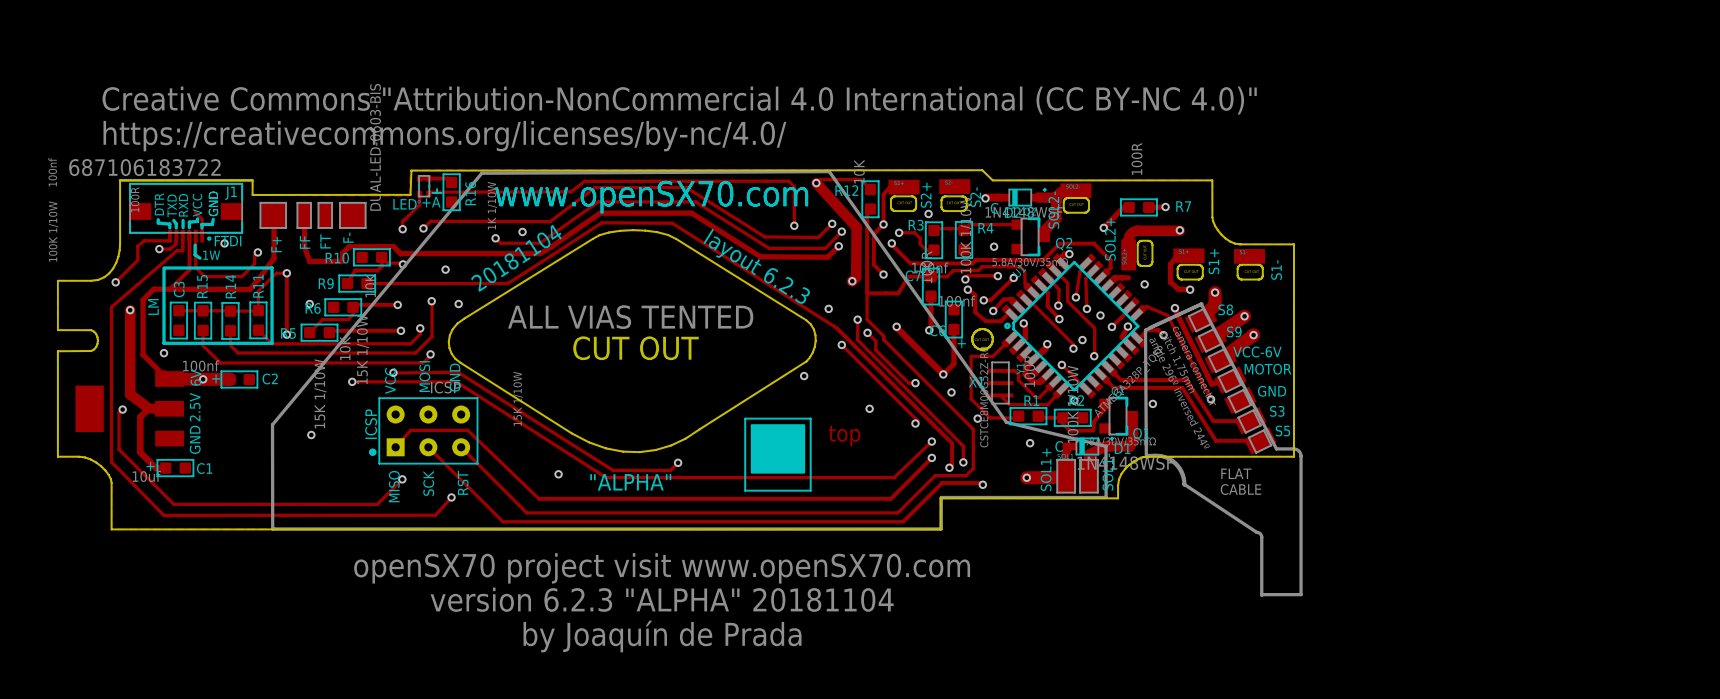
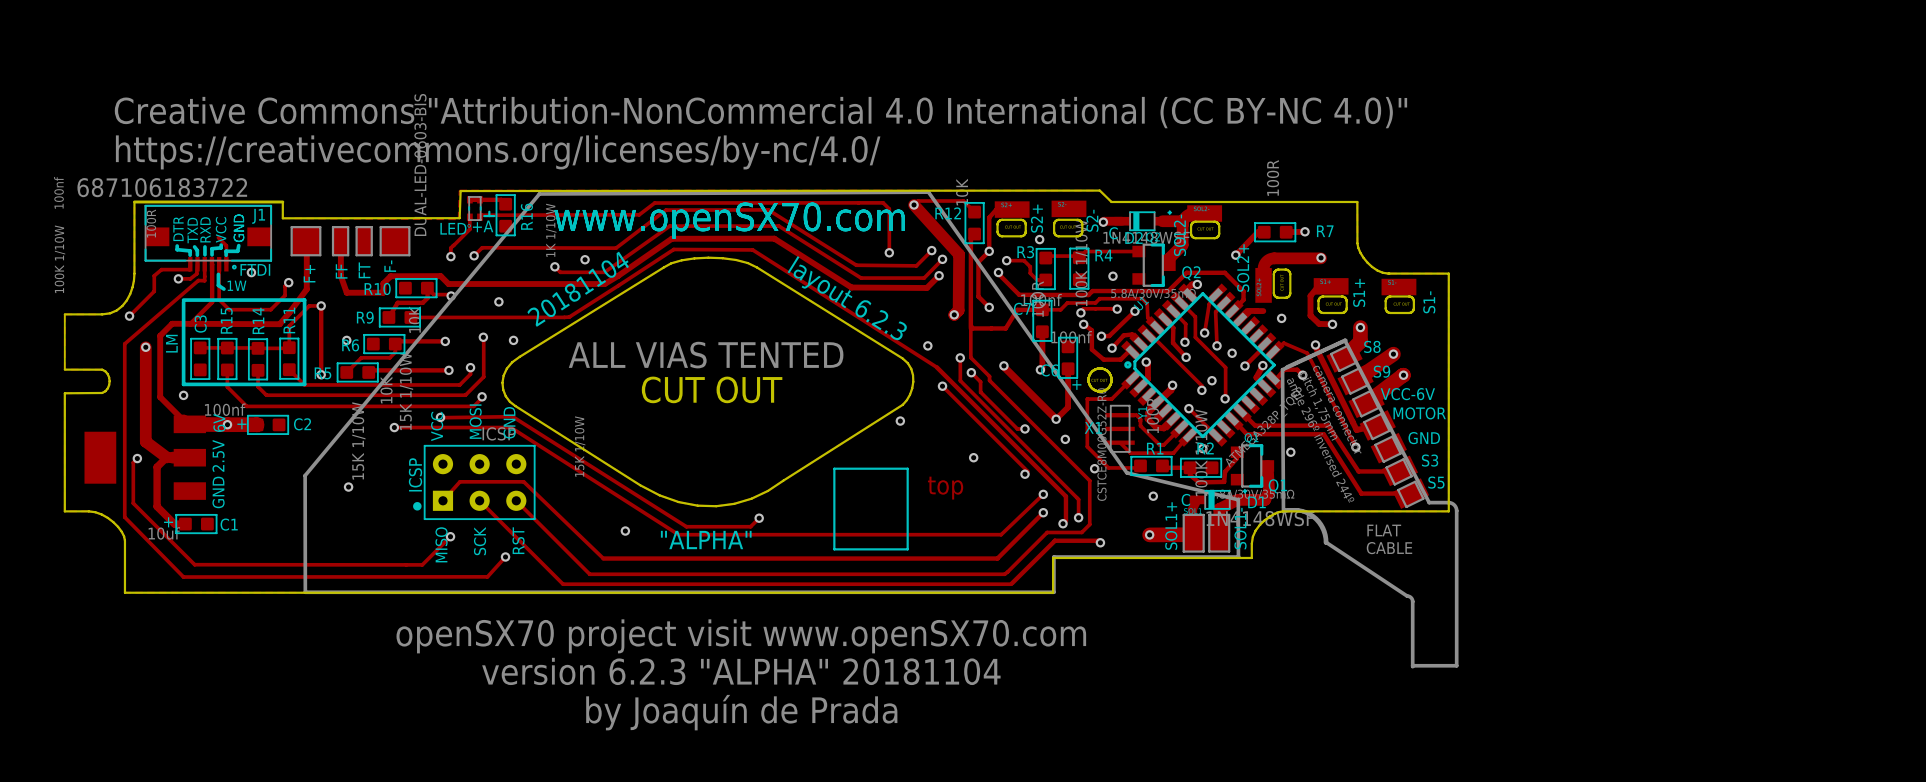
drawing: [750, 424, 806, 474] -> none

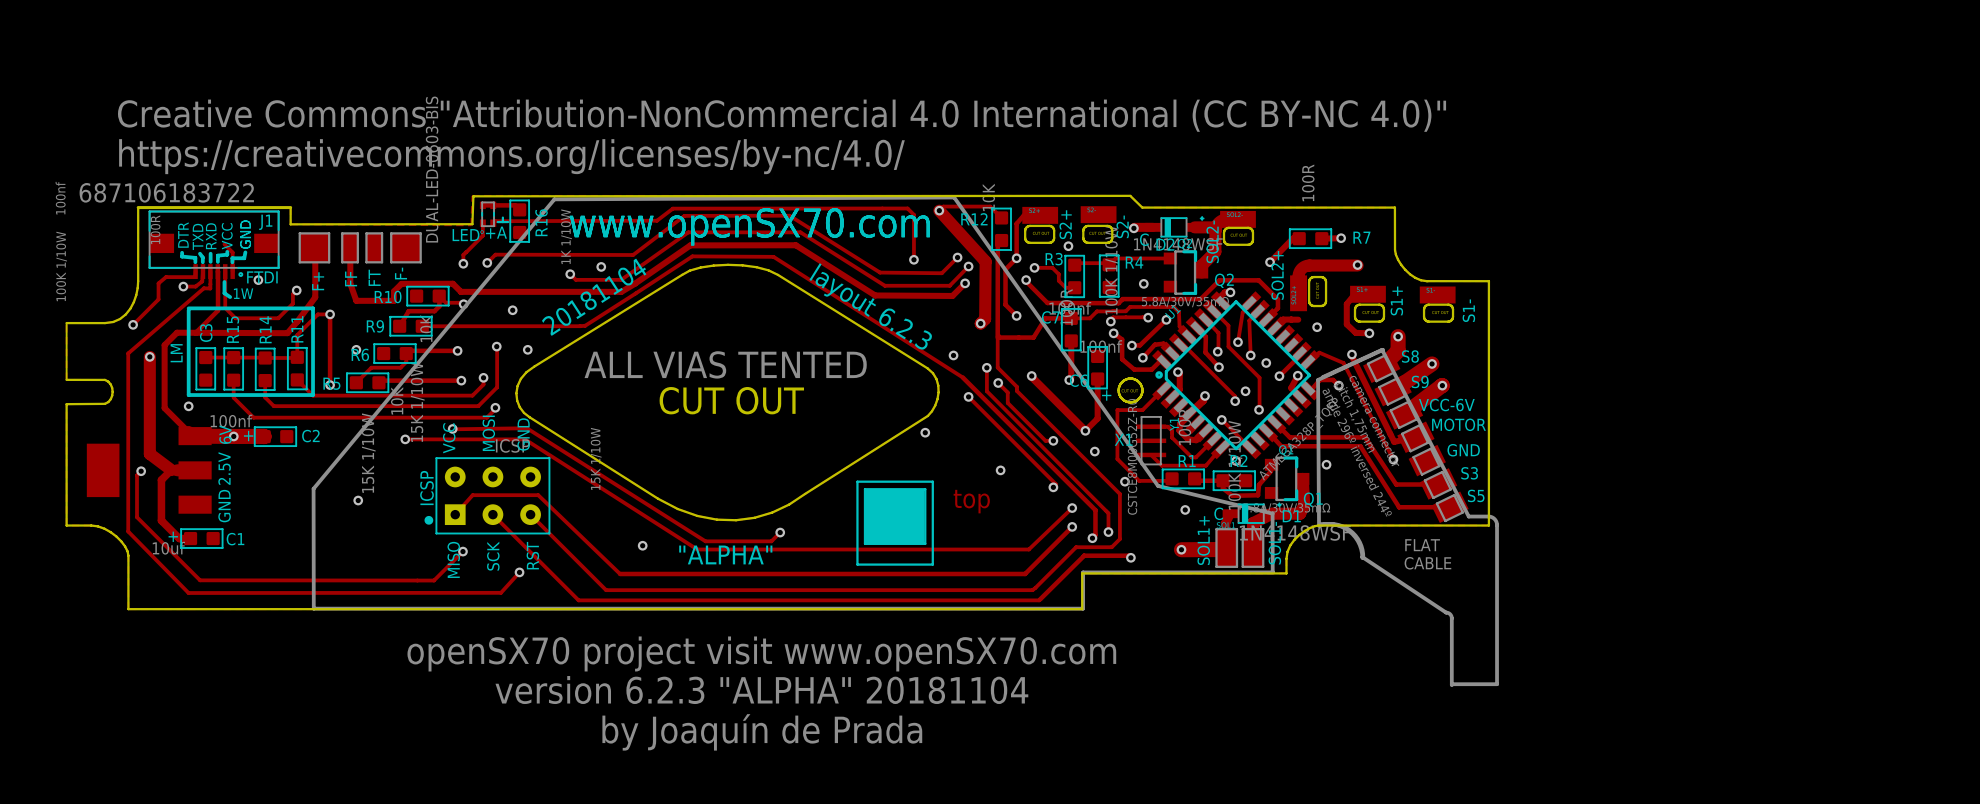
line: none -> (864, 489) (925, 489) (925, 543) (864, 543) (864, 489)
drawing: none -> [865, 489, 925, 544]

